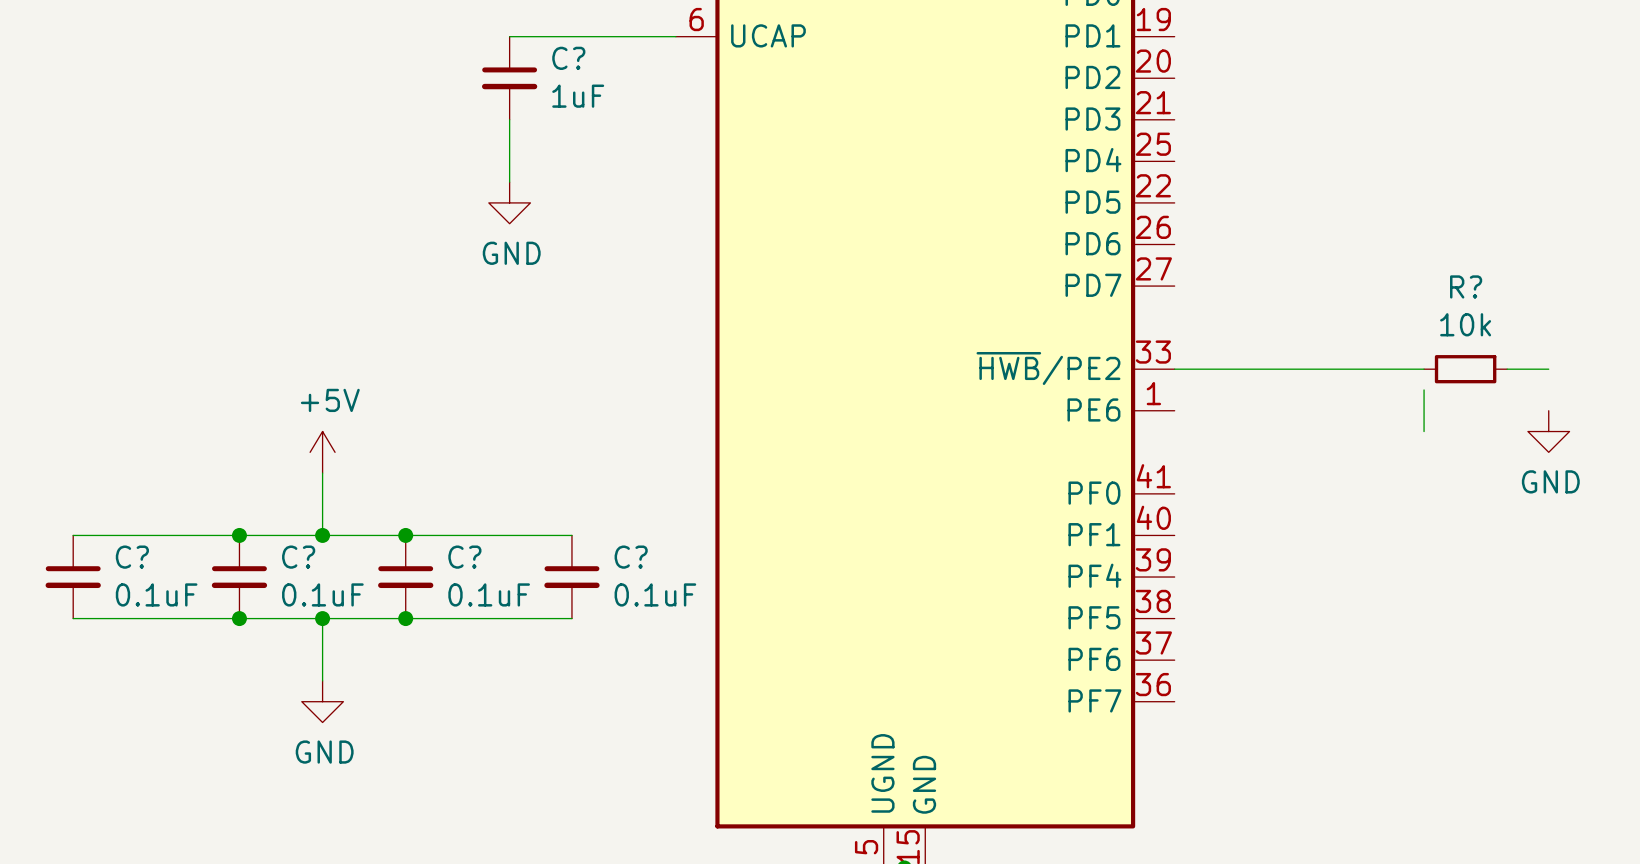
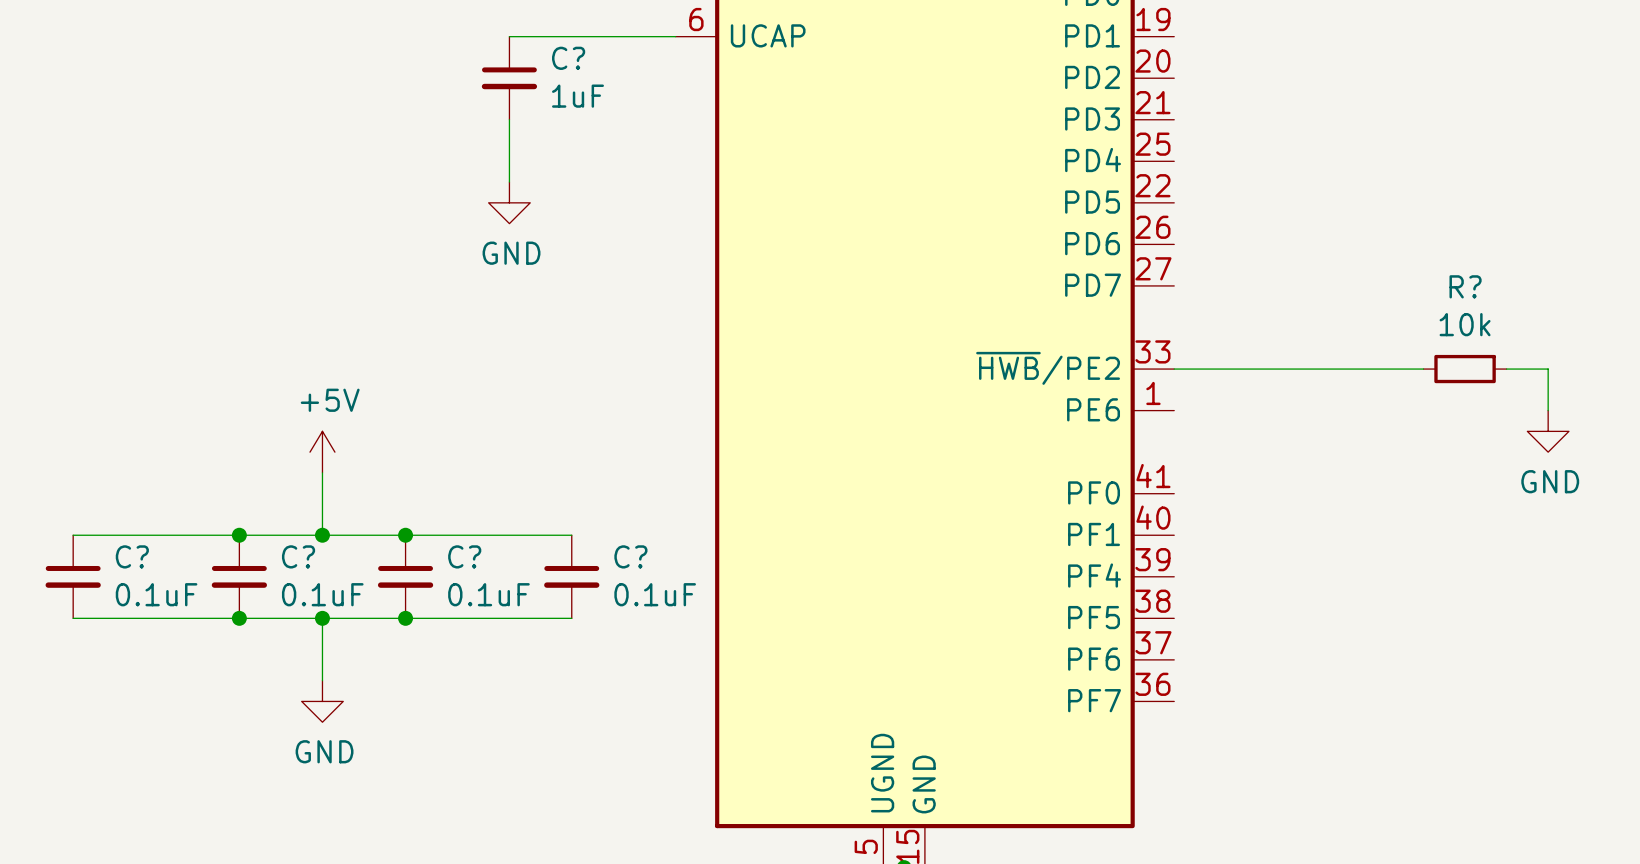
wire: (1424, 389) (1424, 431) -> (1548, 369) (1548, 410)

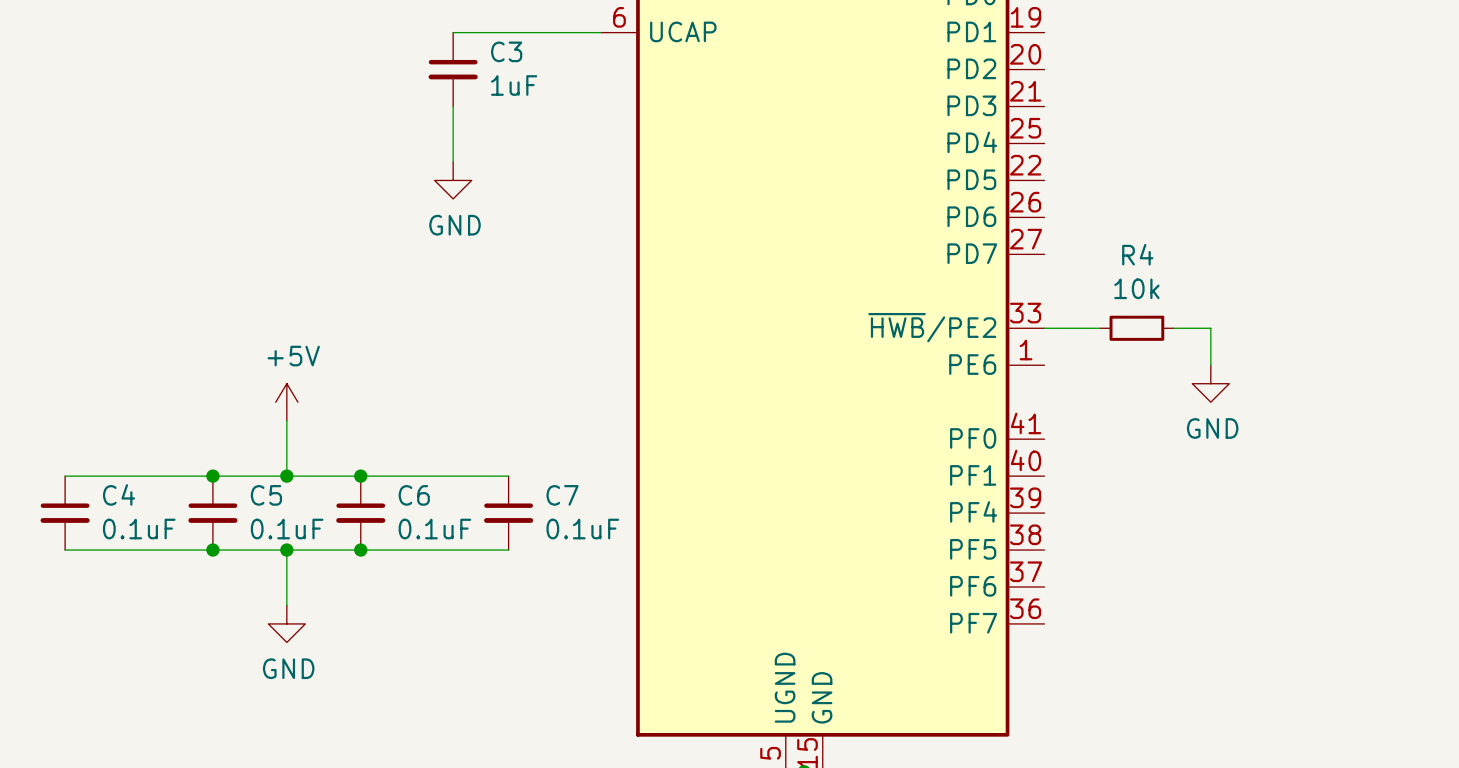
C? name: C? (568, 58) -> C3 (506, 51)
wire: (1236, 369) (1319, 369) -> none
R4: none -> 10k (1136, 328)
wire: (1361, 369) (1423, 369) -> (1210, 328) (1210, 365)
R?: 10k (1465, 369) -> none
wire: (1506, 369) (1548, 369) (1548, 410) -> none
power symbol position: GND (1548, 431) -> GND (1210, 383)
C? name: C? (132, 556) -> C4 (119, 494)
C? name: C? (298, 556) -> C5 (266, 495)
C? name: C? (464, 556) -> C6 (414, 495)
C? name: C? (630, 556) -> C7 (562, 495)

